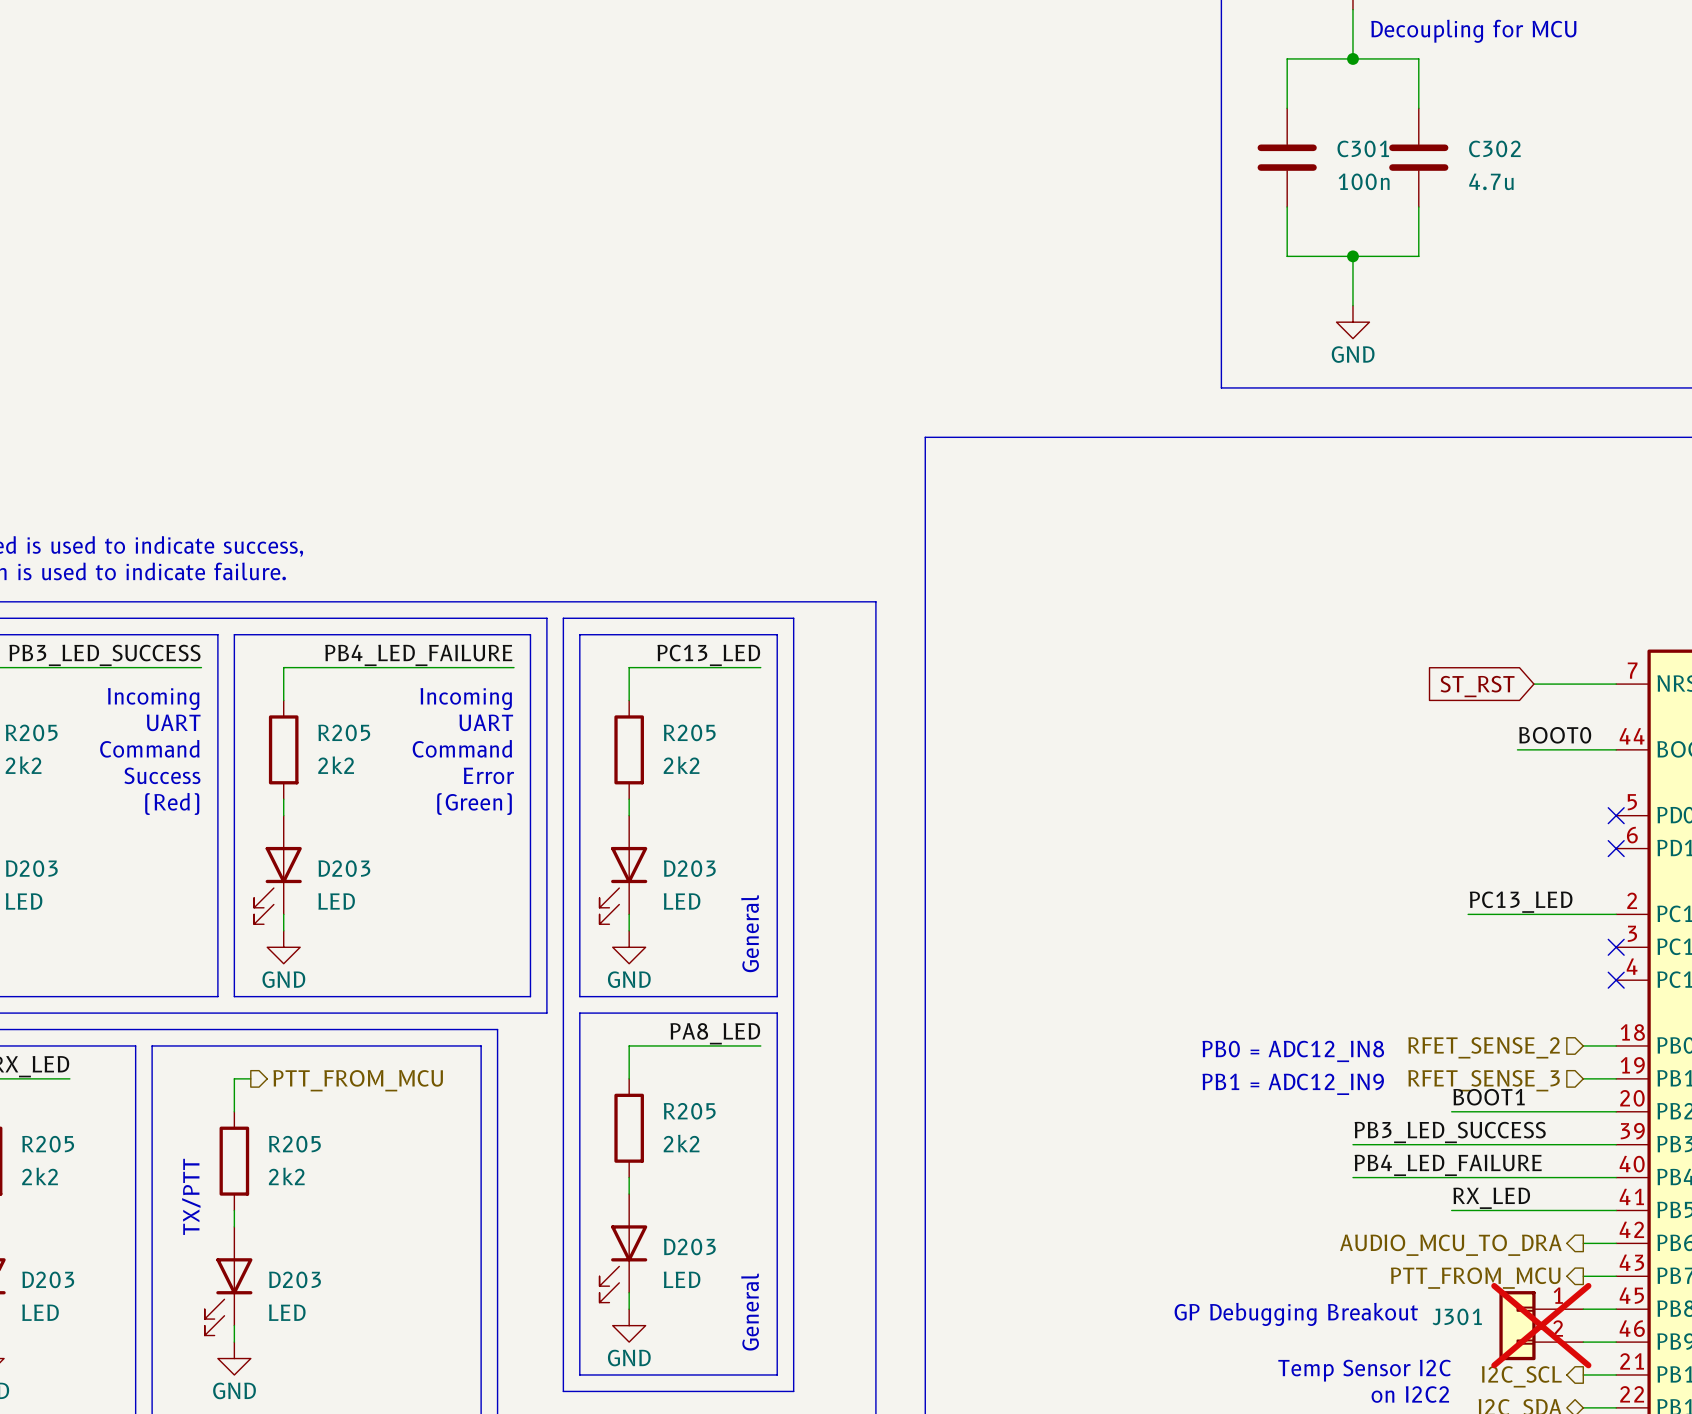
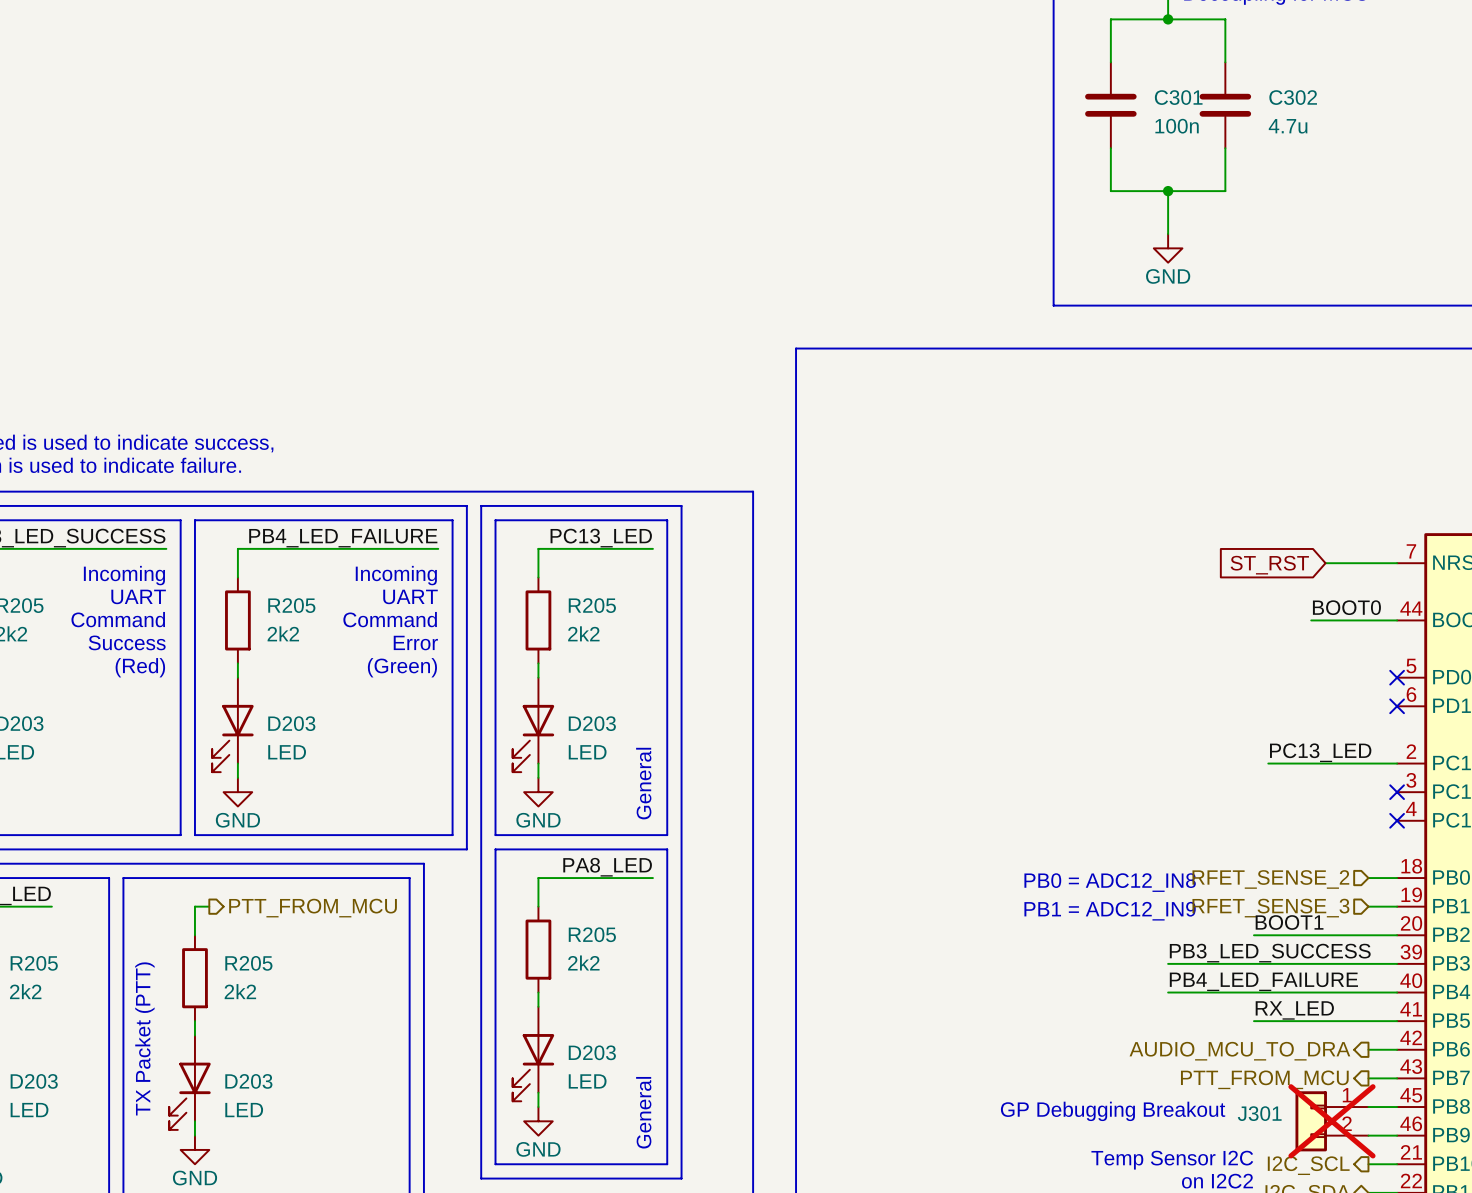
text: TX/PTT (191, 1196) -> none
text: none -> TX Packet (PTT) (144, 1038)

